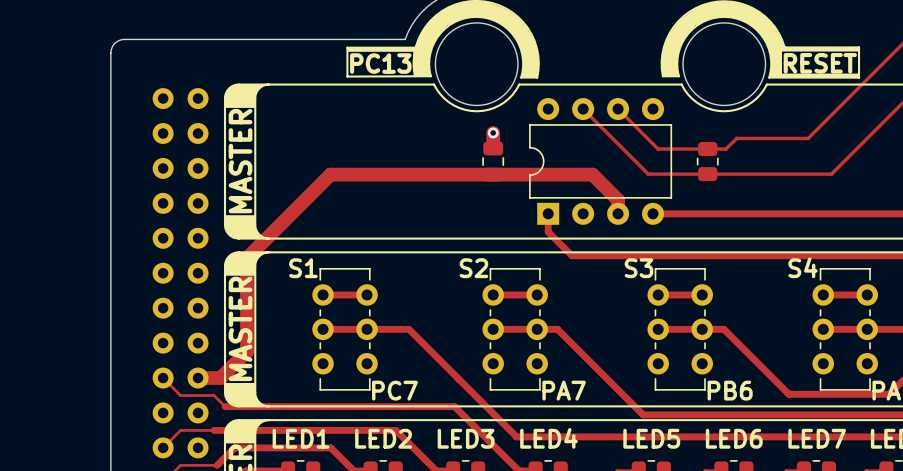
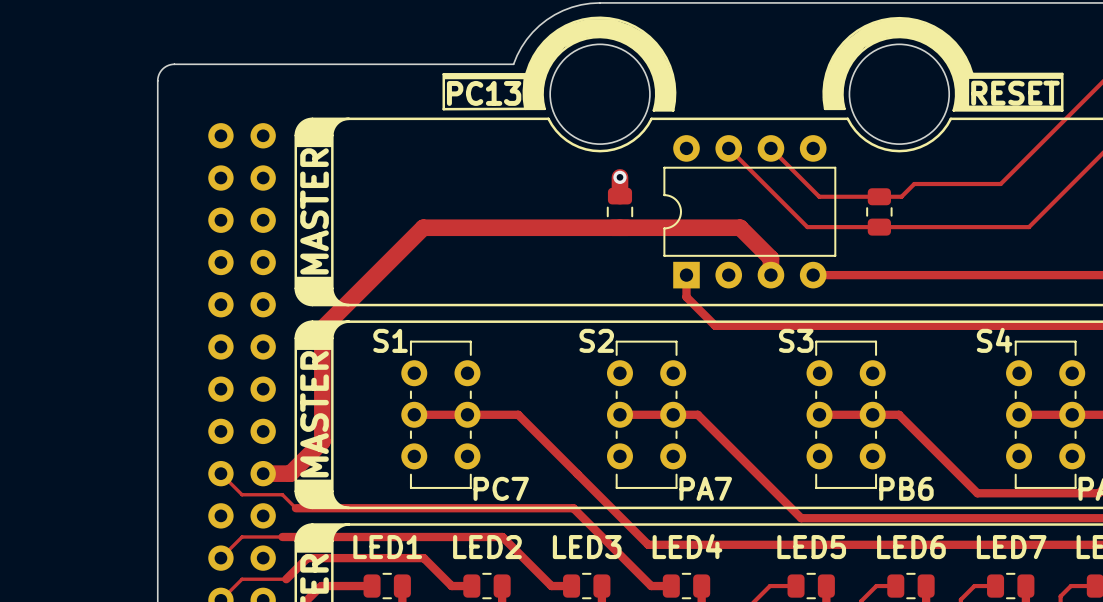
track: (323, 294) (367, 294) -> none
track: (493, 294) (537, 294) -> none
track: (658, 294) (702, 294) -> none
track: (823, 294) (867, 294) -> none

